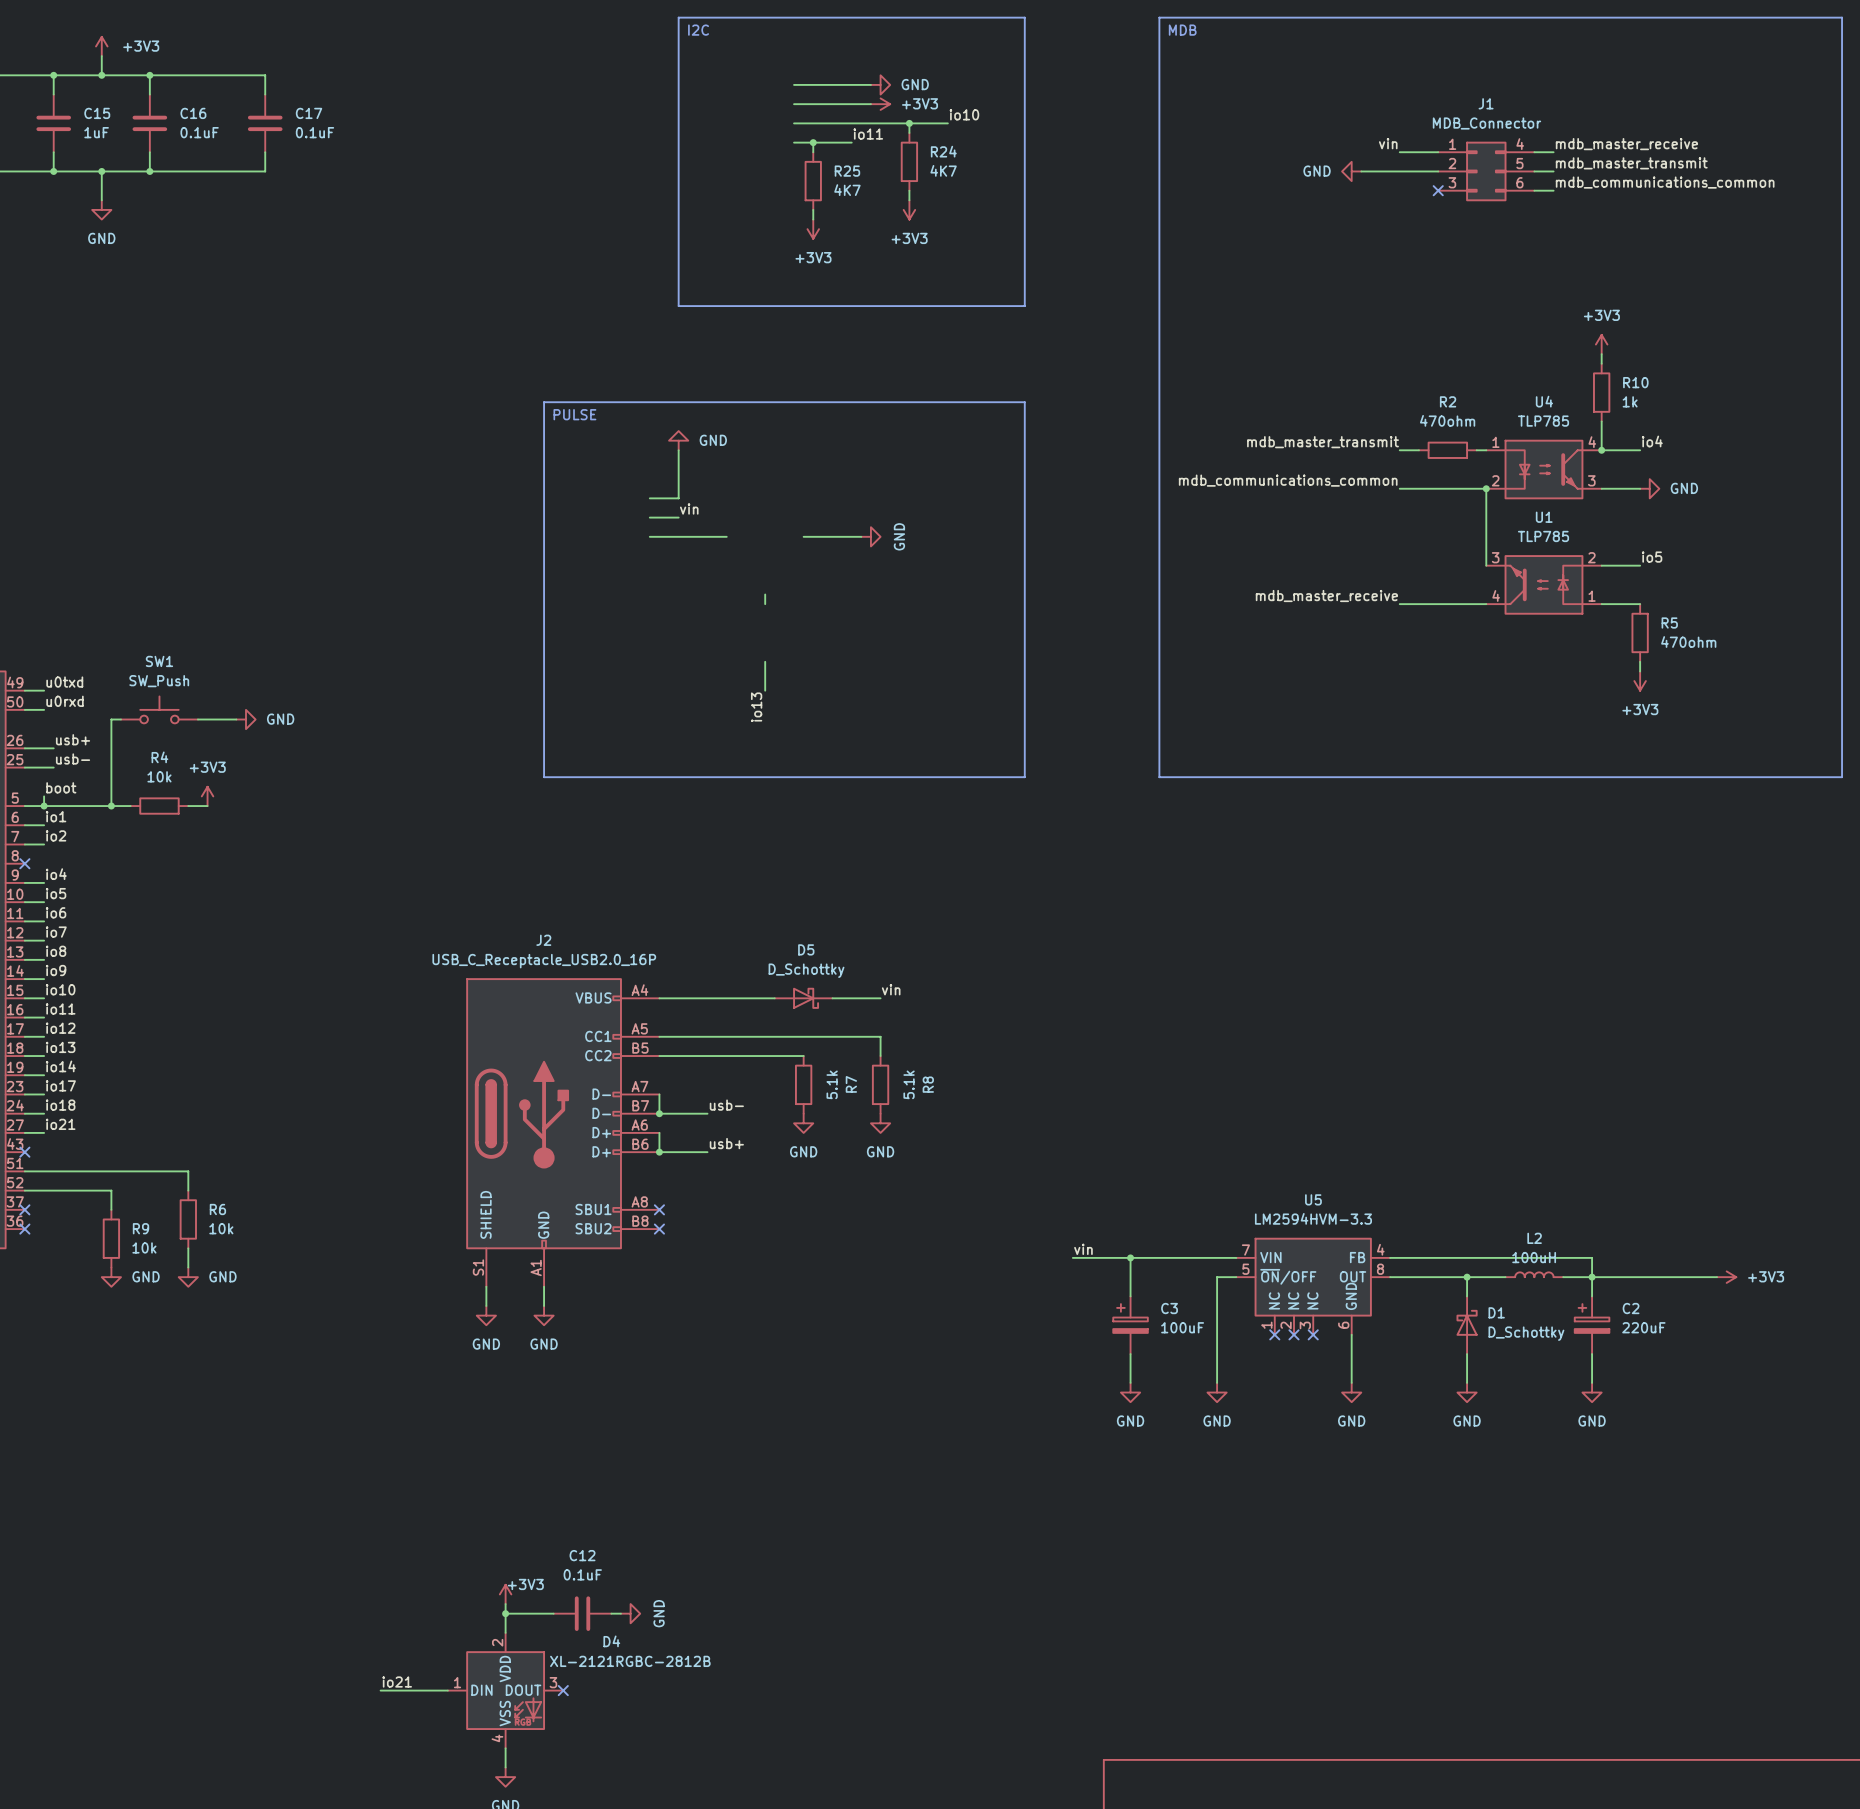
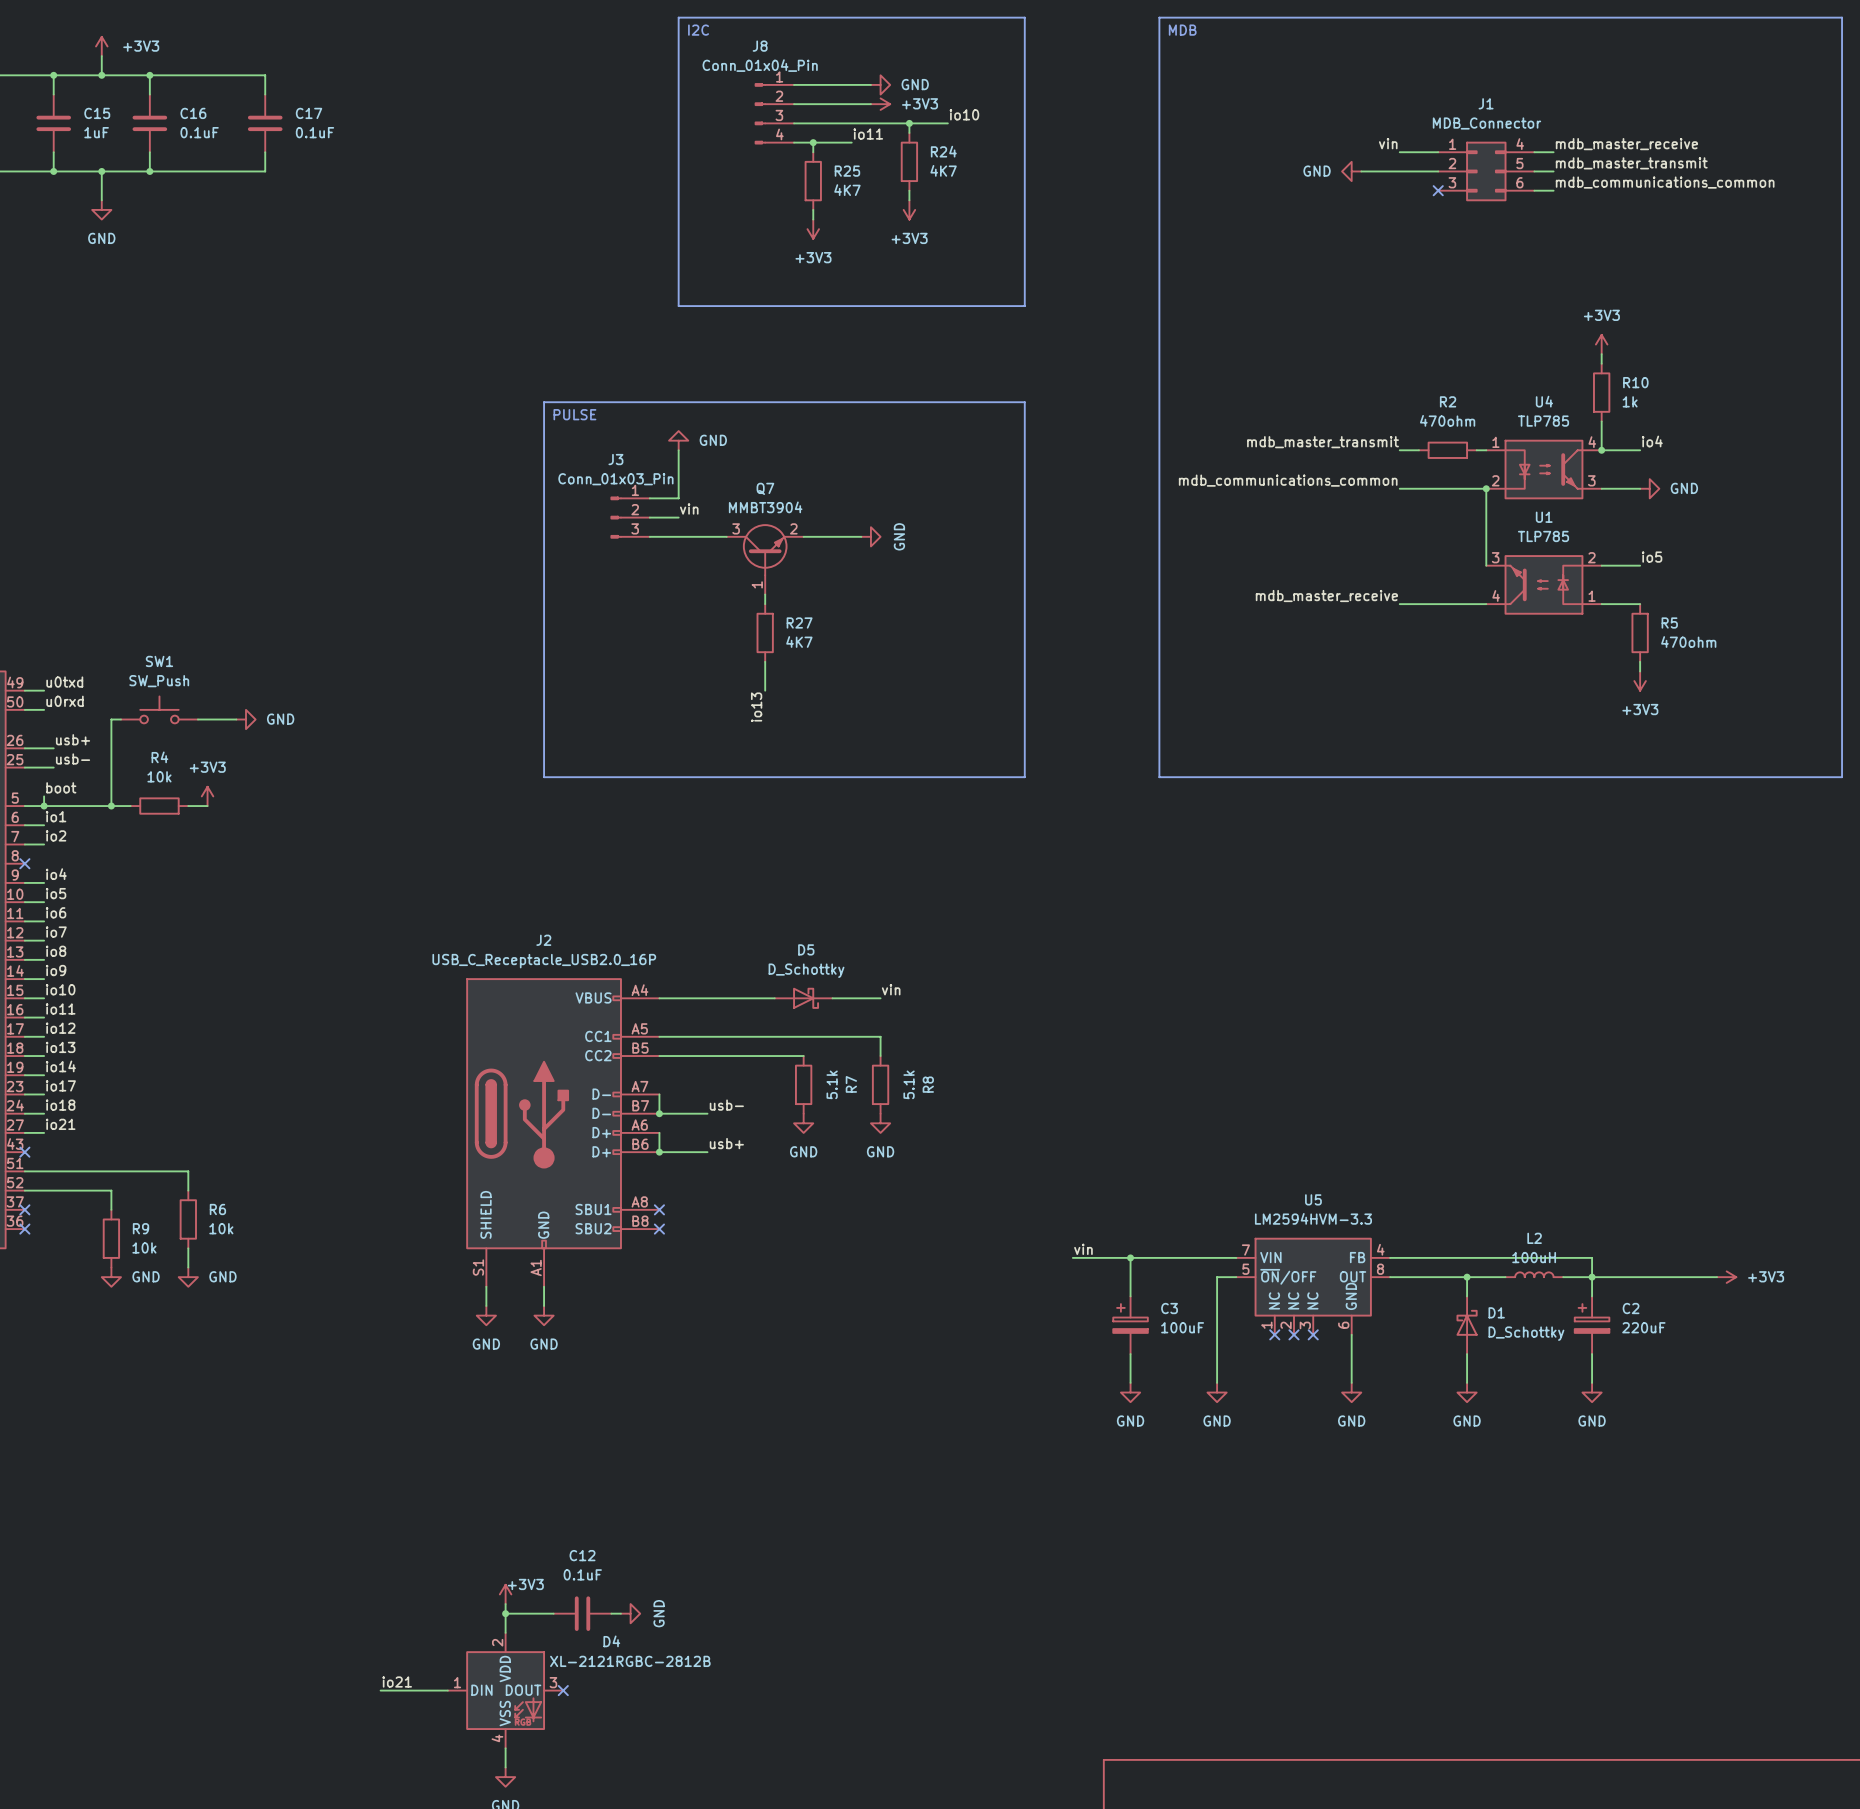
J8: none -> Conn_01x04_Pin (774, 113)
J3: none -> Conn_01x03_Pin (630, 517)
Q7: none -> MMBT3904 (765, 559)
R27: none -> 4K7 (765, 632)

